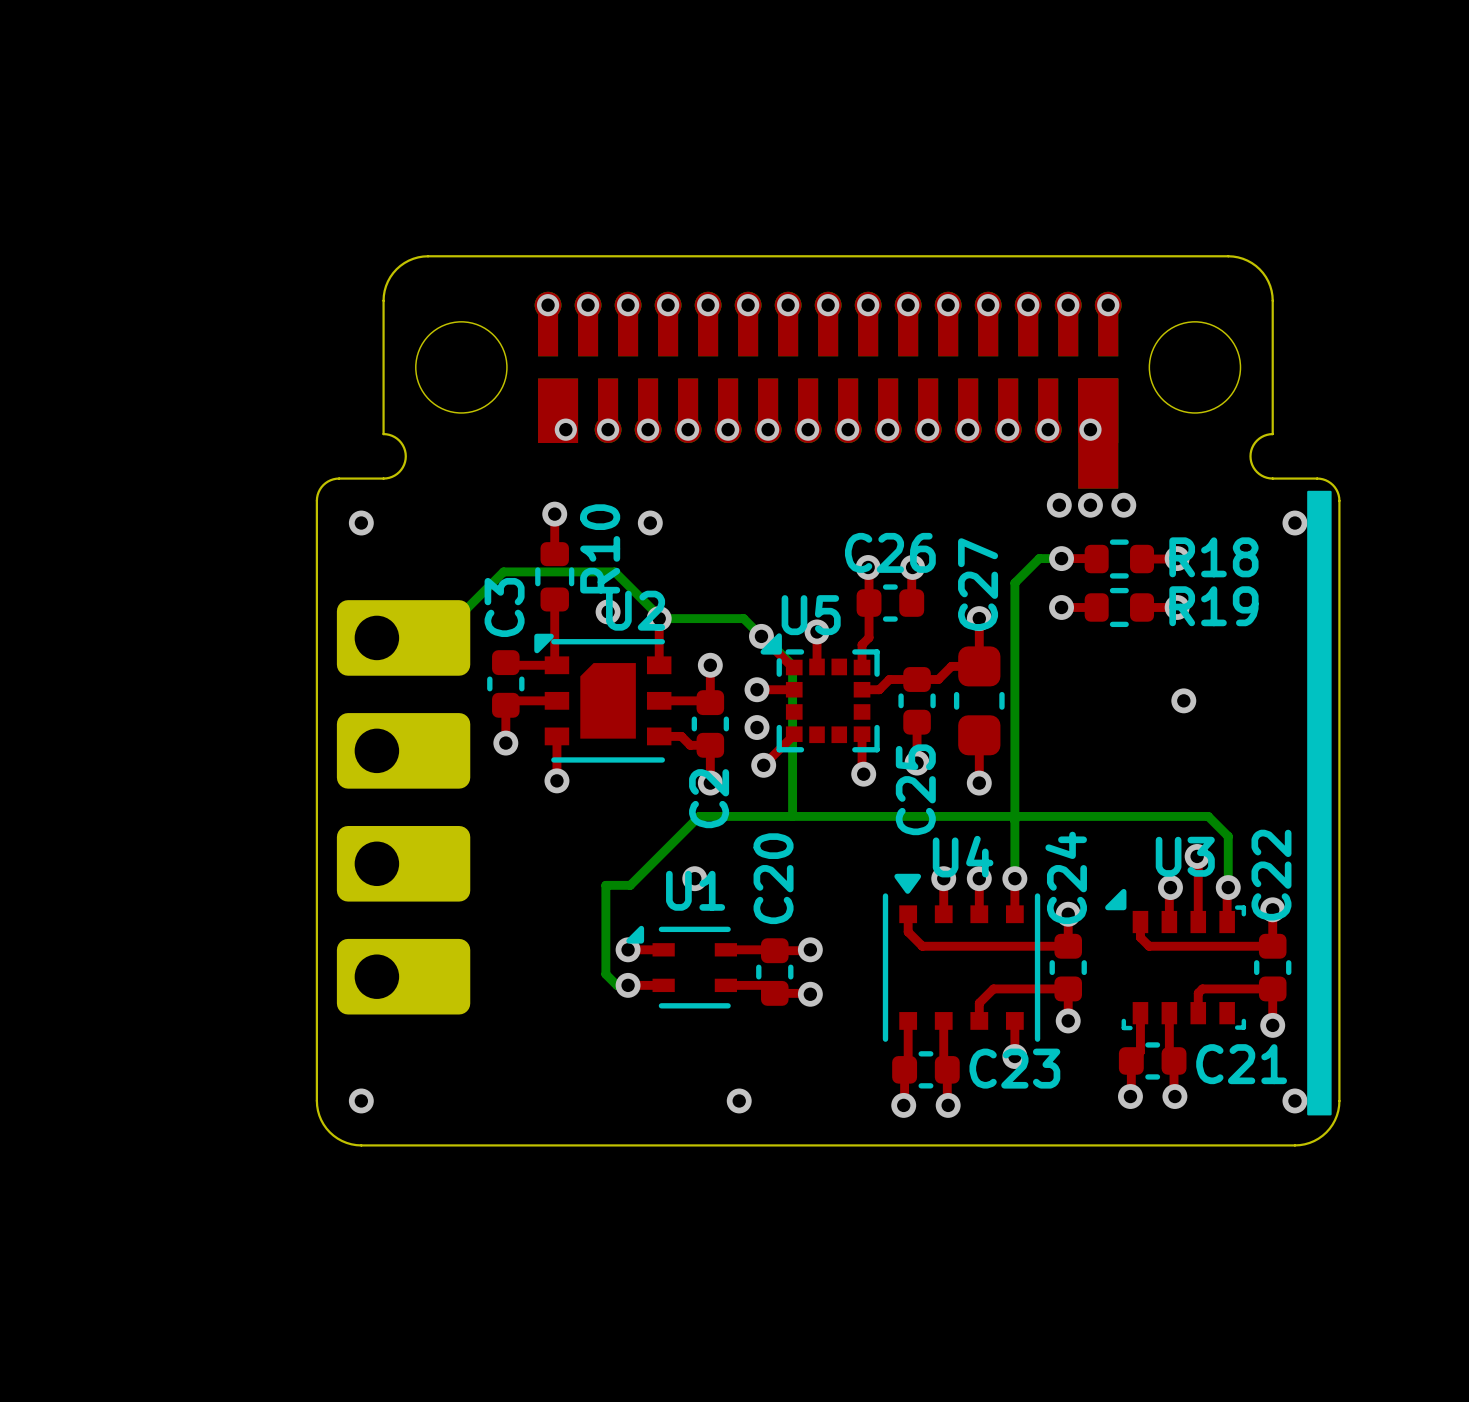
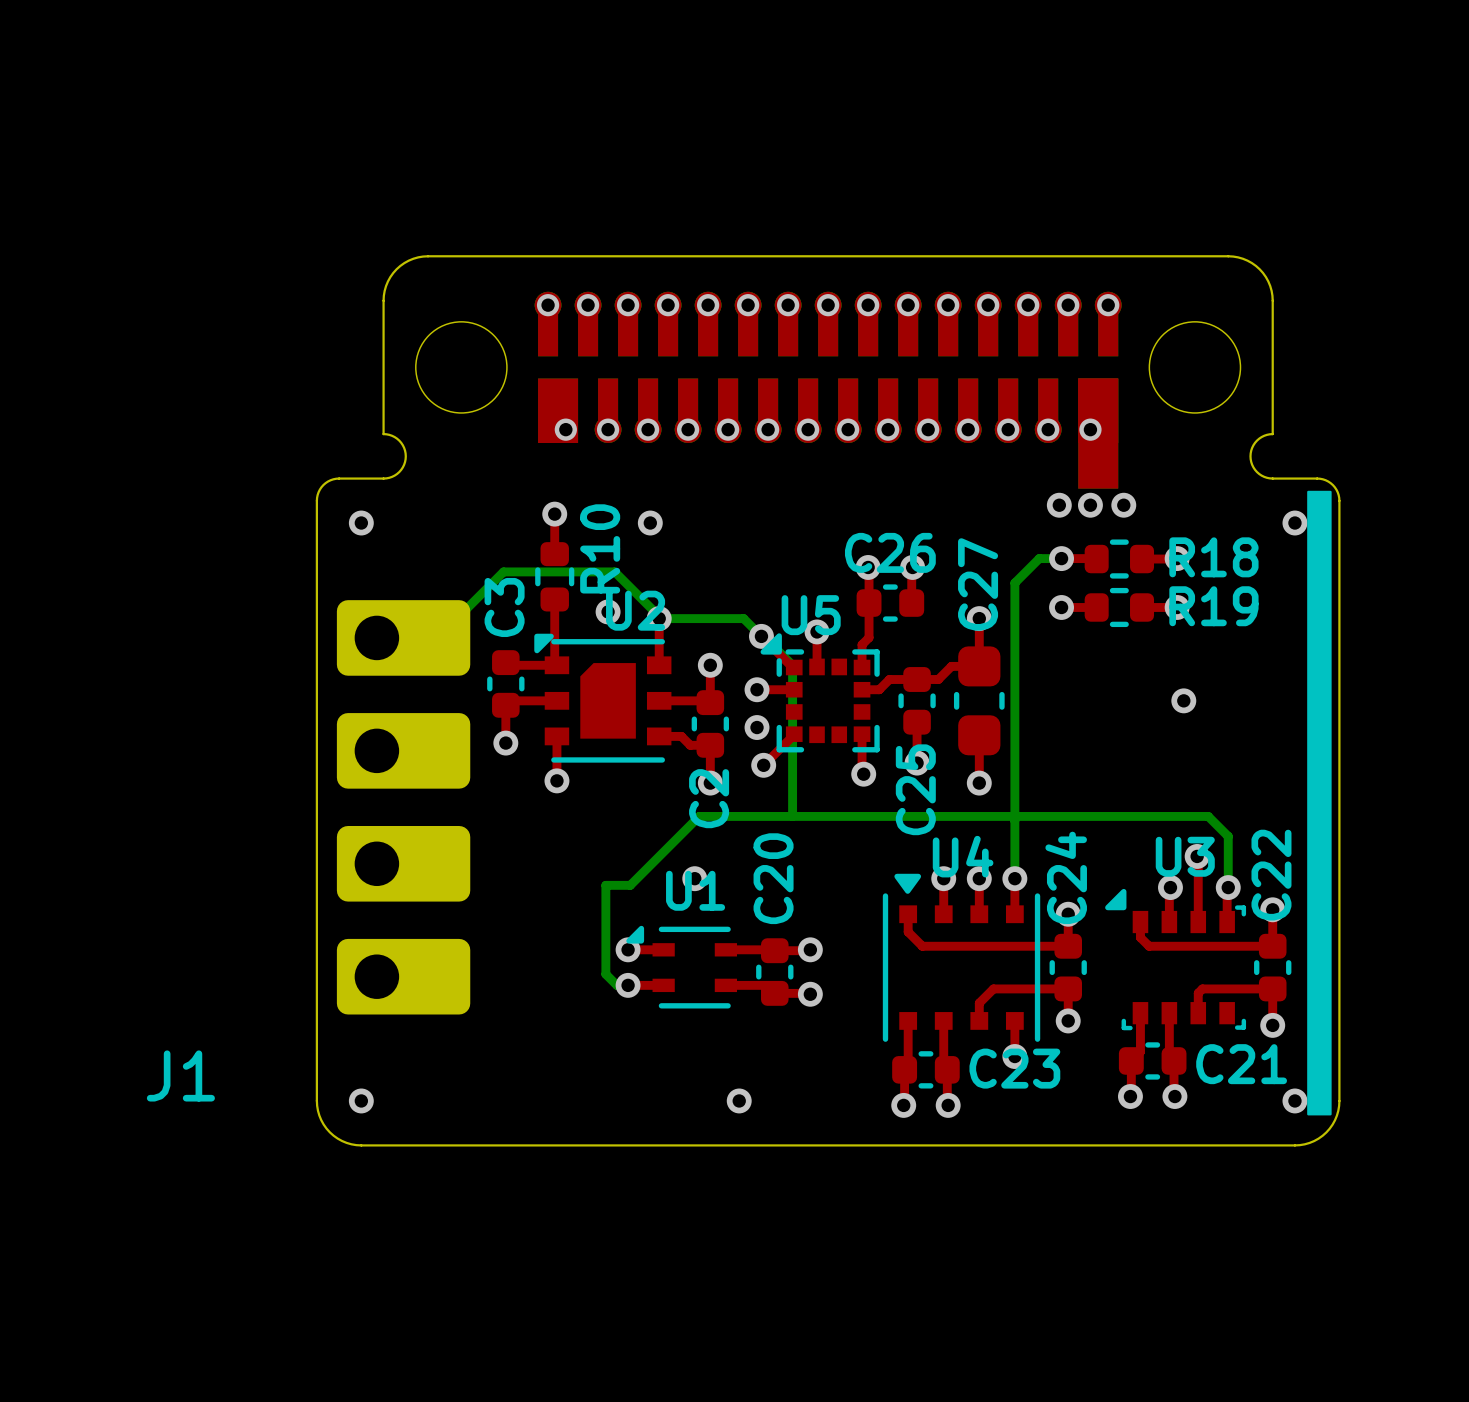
J1 name: none -> J1 (180, 1075)

